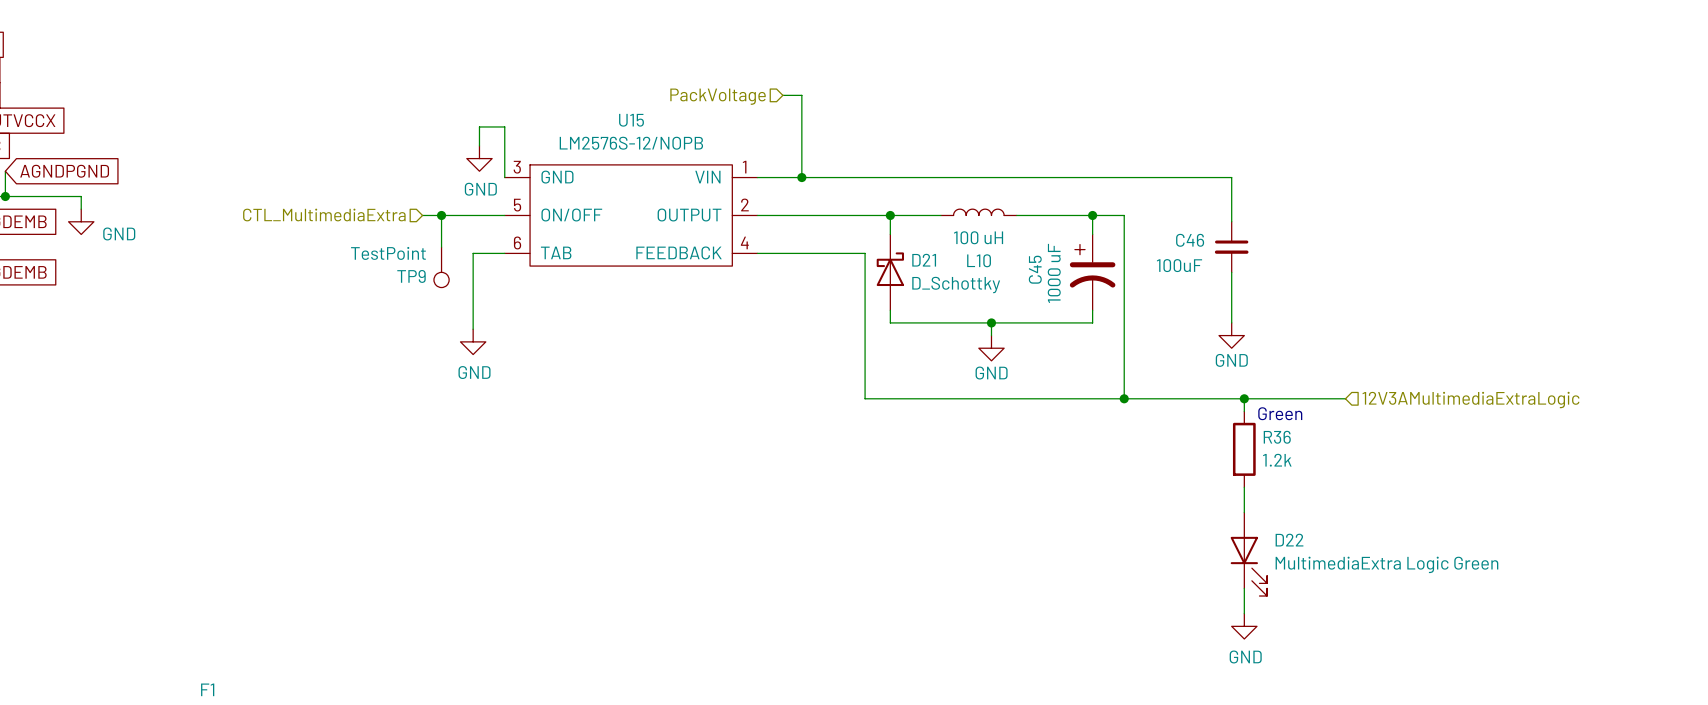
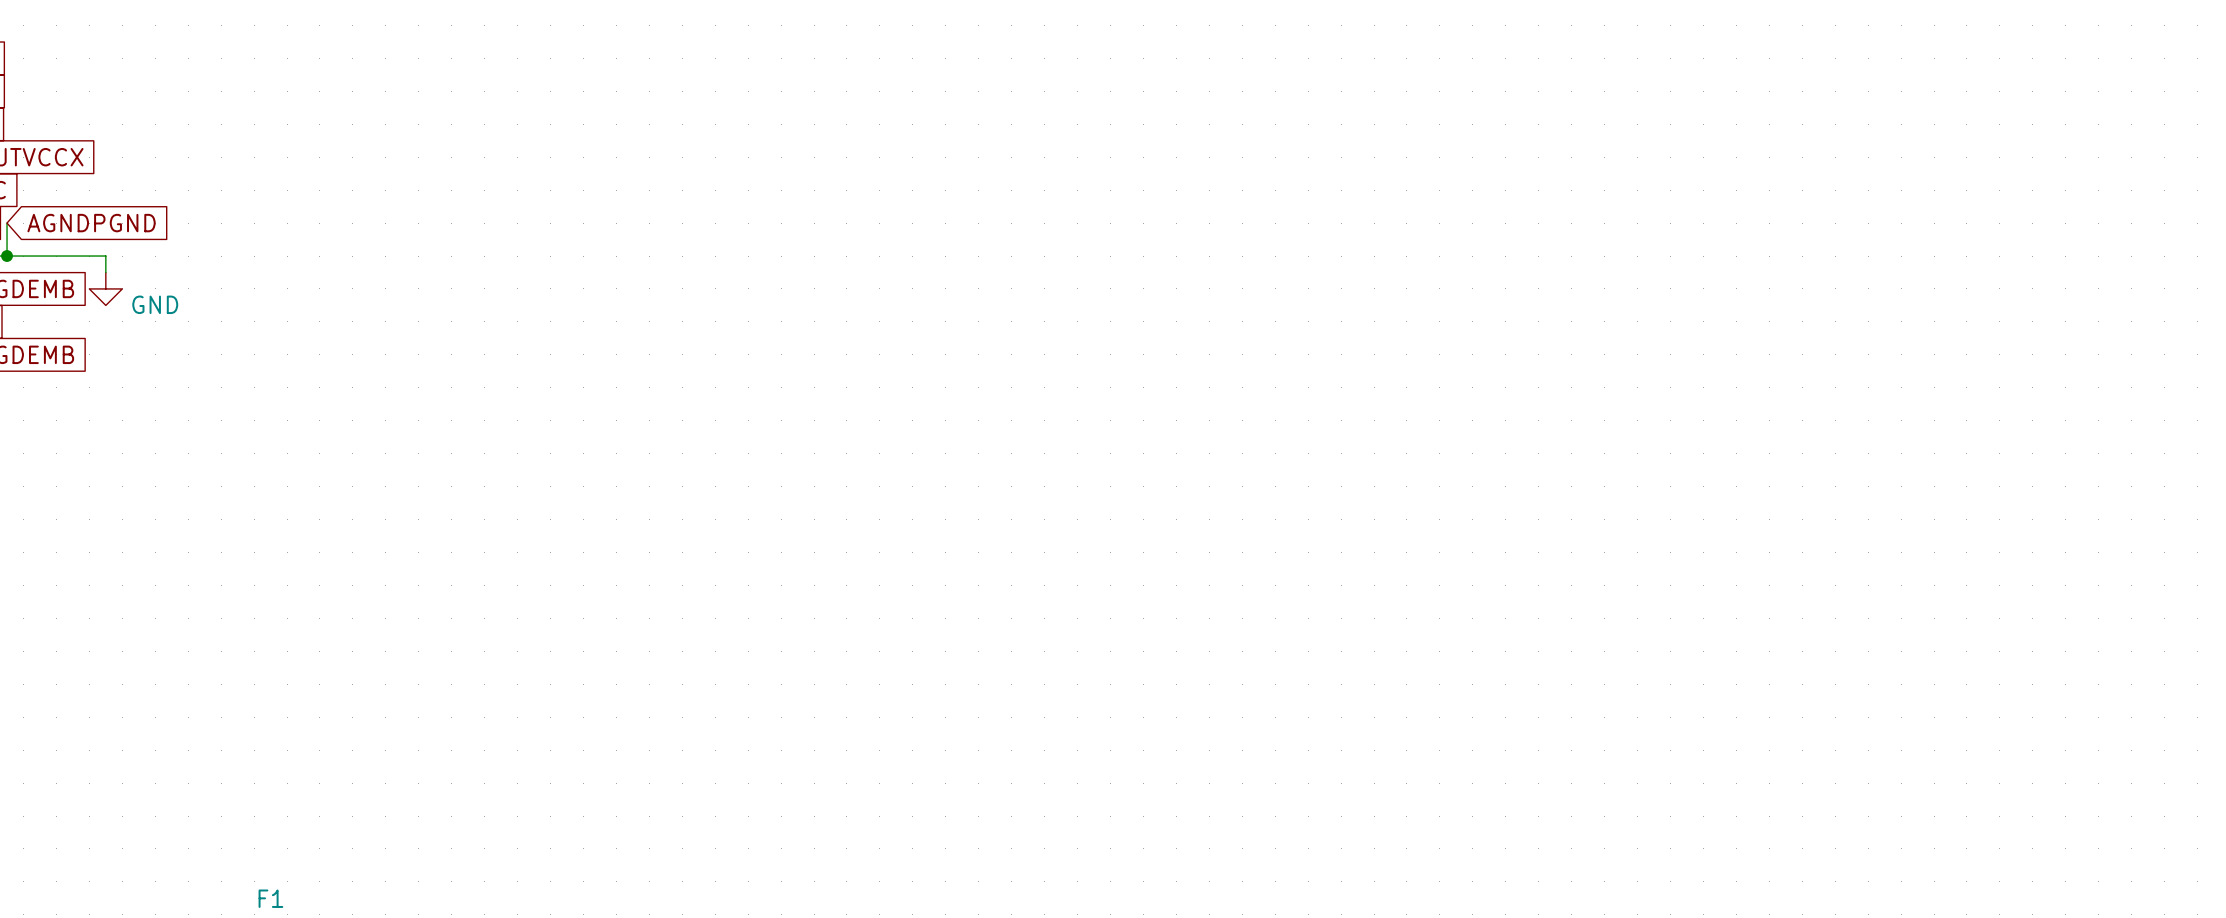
wire: (782, 95) (801, 95) (801, 177) -> none
hierarchical label: PackVoltage (718, 96) -> none
wire: (479, 145) (479, 126) (504, 126) (504, 177) -> none
power symbol: GND (479, 158) -> none
wire: (757, 177) (1231, 177) (1231, 221) -> none
junction: (801, 177) -> none
L10: 100 uH (978, 212) -> none
hierarchical label: CTL_MultimediaExtra (324, 215) -> none
wire: (422, 215) (504, 215) -> none
wire: (441, 215) (441, 247) -> none
junction: (441, 215) -> none
U15: LM2576S-12/NOPB (631, 215) -> none
wire: (757, 215) (940, 215) -> none
wire: (890, 215) (890, 234) -> none
junction: (890, 215) -> none
wire: (1016, 215) (1124, 215) (1124, 398) -> none
wire: (1092, 215) (1092, 234) -> none
junction: (1092, 215) -> none
C46: 100uF (1231, 247) -> none
wire: (504, 253) (473, 253) (473, 329) -> none
wire: (757, 253) (865, 253) (865, 398) (1345, 398) -> none
TP9: TestPoint (441, 267) -> none
D21: D_Schottky (890, 272) -> none
C45: 1000 uF (1092, 272) -> none
wire: (1231, 272) (1231, 322) -> none
wire: (890, 310) (890, 322) (1092, 322) (1092, 310) -> none
wire: (991, 322) (991, 335) -> none
junction: (991, 322) -> none
power symbol: GND (1231, 335) -> none
power symbol: GND (473, 341) -> none
power symbol: GND (991, 348) -> none
junction: (1124, 398) -> none
wire: (1244, 398) (1244, 411) -> none
junction: (1244, 398) -> none
hierarchical label: 12V3AMultimediaExtraLogic (1471, 400) -> none
text: Green (1280, 413) -> none
R36: 1.2k (1244, 449) -> none
wire: (1244, 487) (1244, 512) -> none
D22: MultimediaExtra Logic Green (1248, 554) -> none
wire: (1244, 588) (1244, 613) -> none
power symbol: GND (1244, 626) -> none

